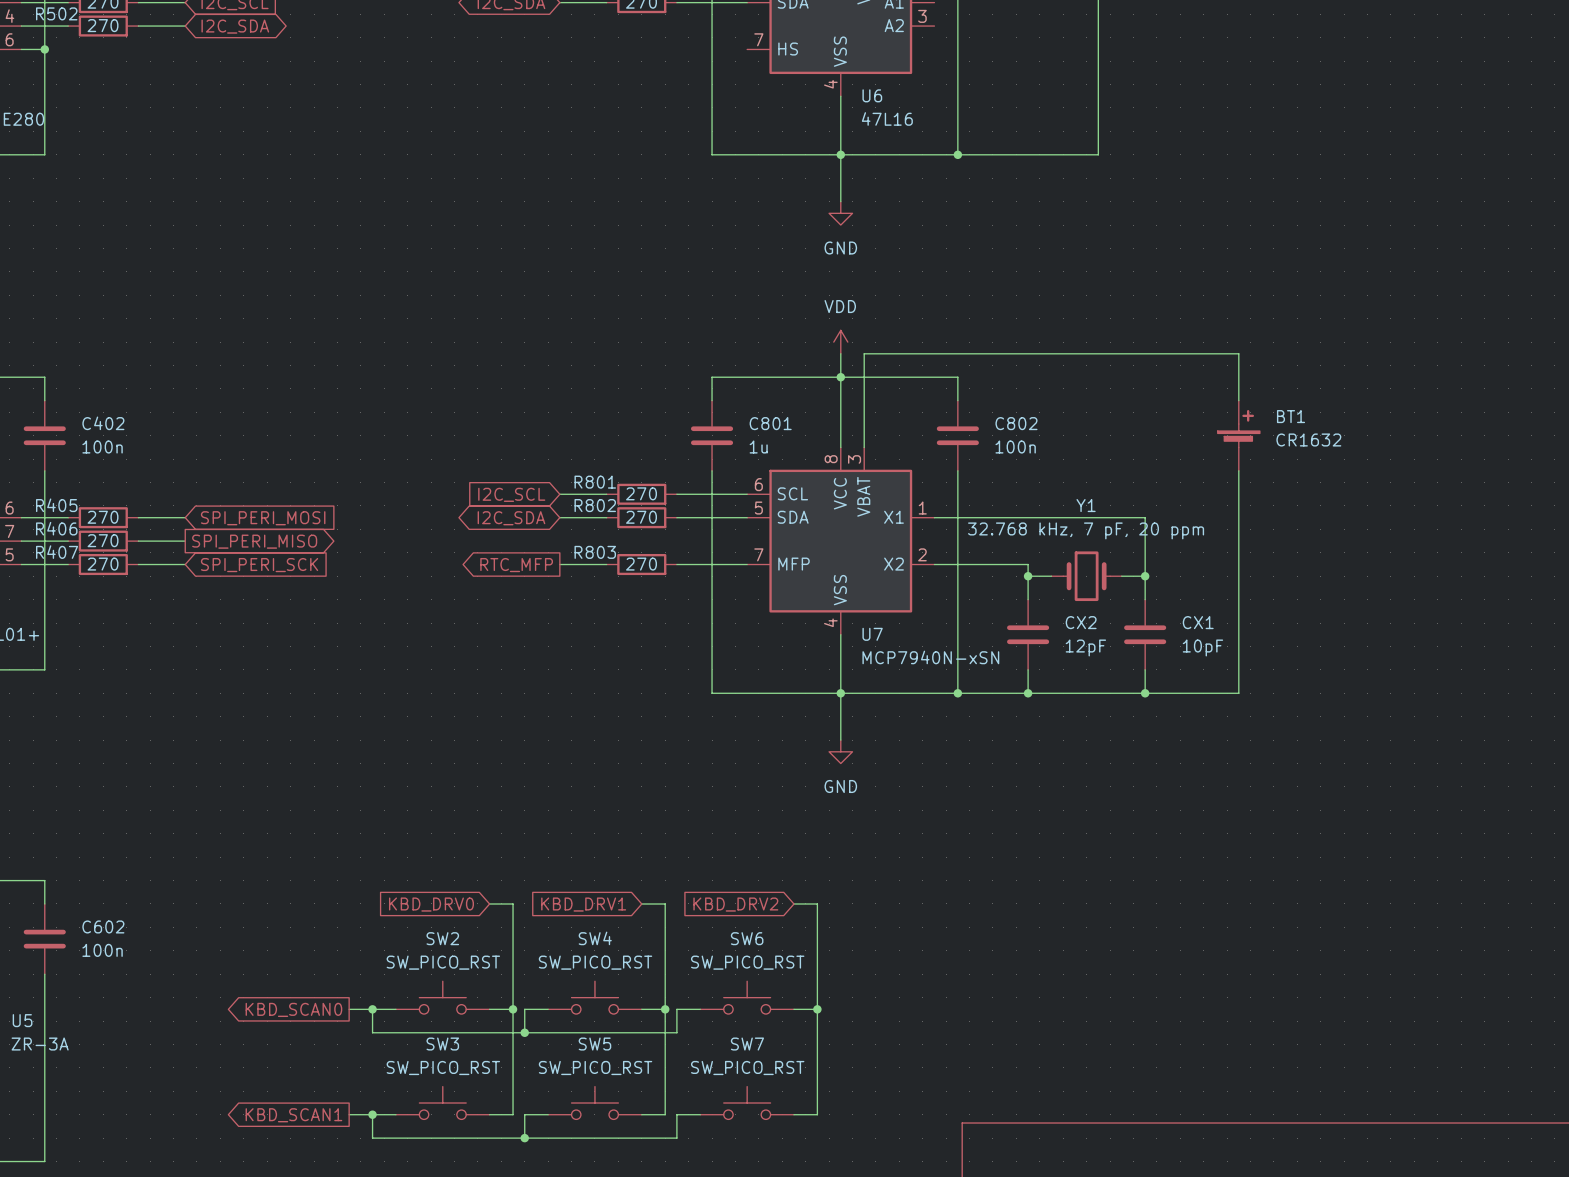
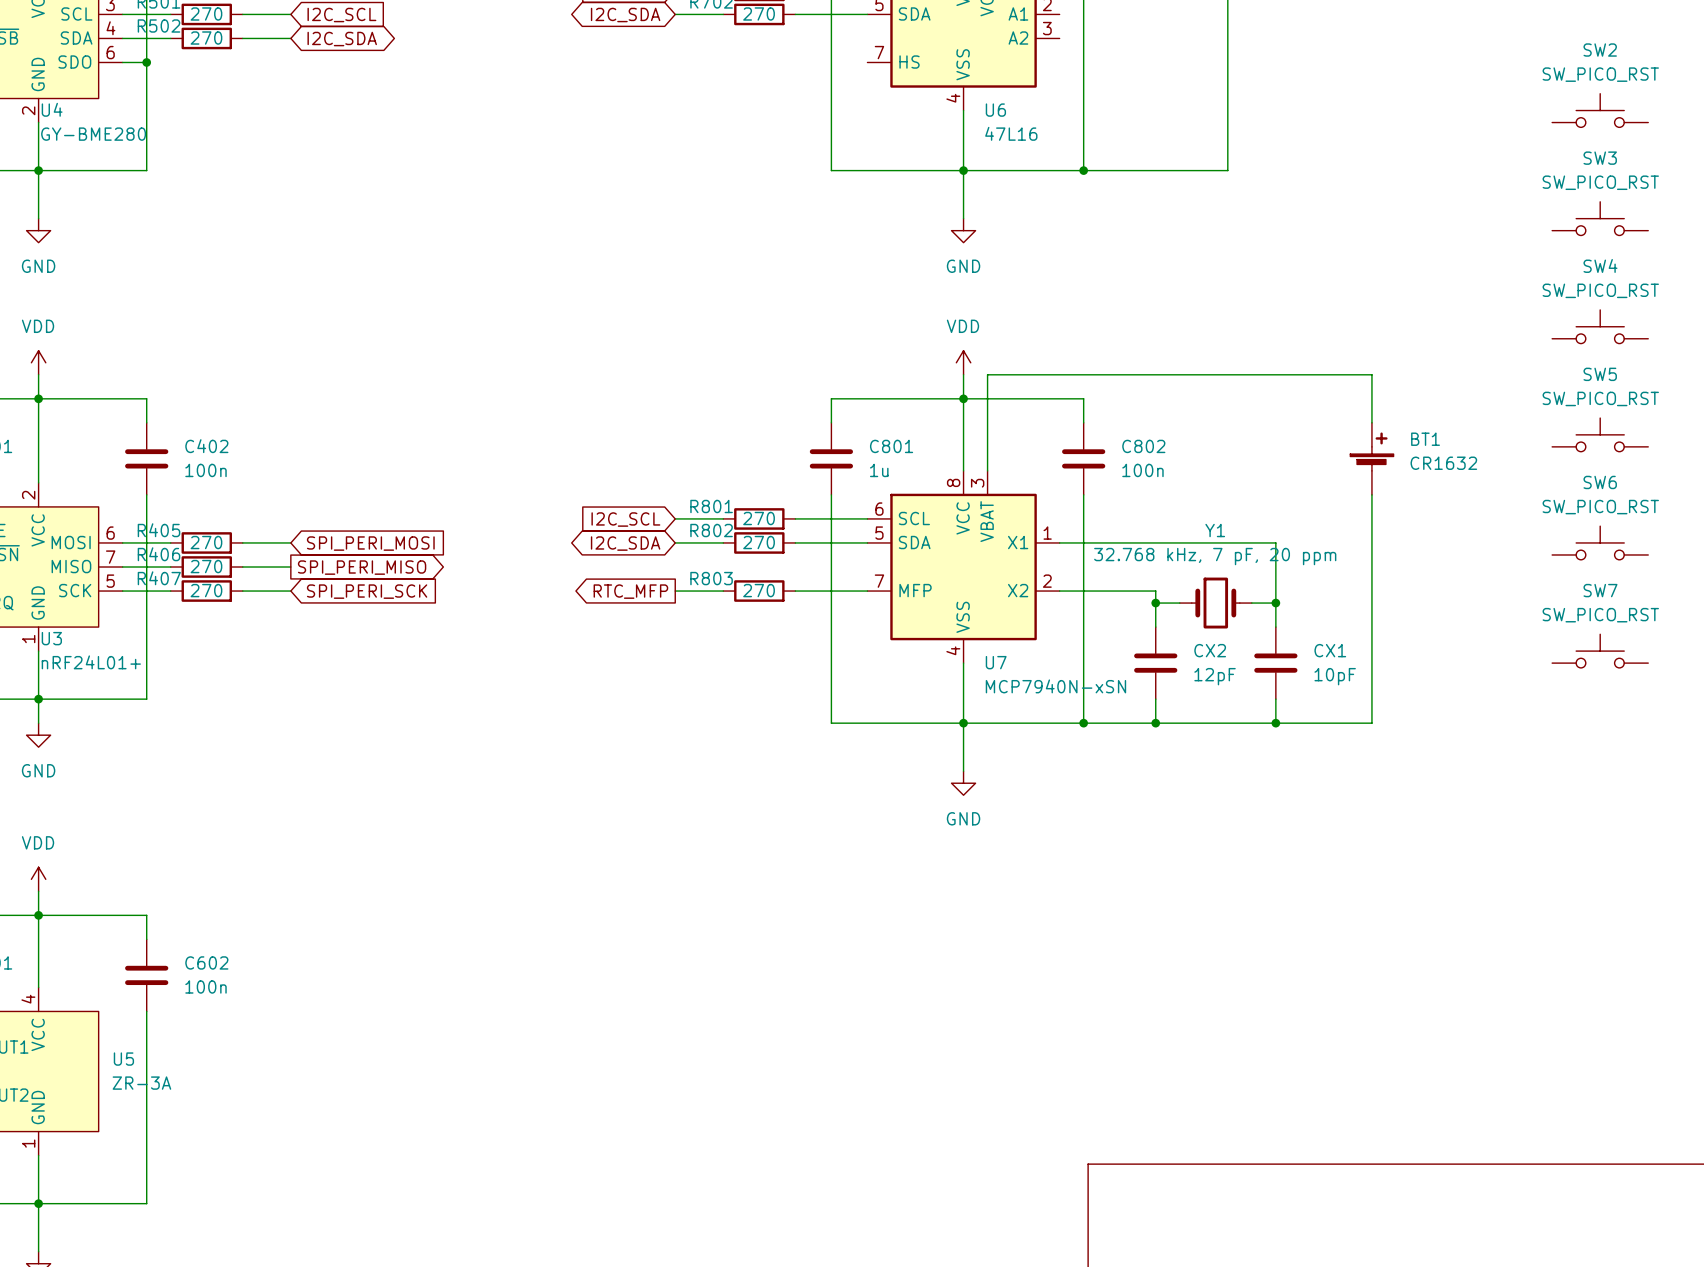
wire: (489, 903) (513, 903) (513, 1114) (489, 1114) -> none
wire: (641, 903) (665, 903) (665, 1114) (641, 1114) -> none
wire: (793, 903) (817, 903) (817, 1114) (793, 1114) -> none
global label: KBD_DRV0 (431, 904) -> none
global label: KBD_DRV1 (583, 904) -> none
global label: KBD_DRV2 (735, 904) -> none
SW2 position: (442, 997) -> (1600, 110)
SW4 position: (594, 997) -> (1600, 326)
SW6 position: (747, 997) -> (1600, 542)
global label: KBD_SCAN0 (293, 1009) -> none
wire: (349, 1009) (395, 1009) -> none
wire: (372, 1009) (372, 1032) (676, 1032) (676, 1009) (700, 1009) -> none
junction: (372, 1009) -> none
wire: (489, 1009) (513, 1009) -> none
junction: (513, 1009) -> none
wire: (548, 1009) (524, 1009) (524, 1032) -> none
wire: (641, 1009) (665, 1009) -> none
junction: (665, 1009) -> none
wire: (793, 1009) (817, 1009) -> none
junction: (817, 1009) -> none
junction: (524, 1032) -> none
SW3 position: (442, 1103) -> (1600, 218)
SW5 position: (594, 1103) -> (1600, 434)
SW7 position: (747, 1103) -> (1600, 651)
wire: (349, 1114) (395, 1114) -> none
wire: (372, 1114) (372, 1138) (676, 1138) (676, 1114) (700, 1114) -> none
junction: (372, 1114) -> none
wire: (548, 1114) (524, 1114) (524, 1138) -> none
global label: KBD_SCAN1 (293, 1115) -> none
junction: (524, 1138) -> none

